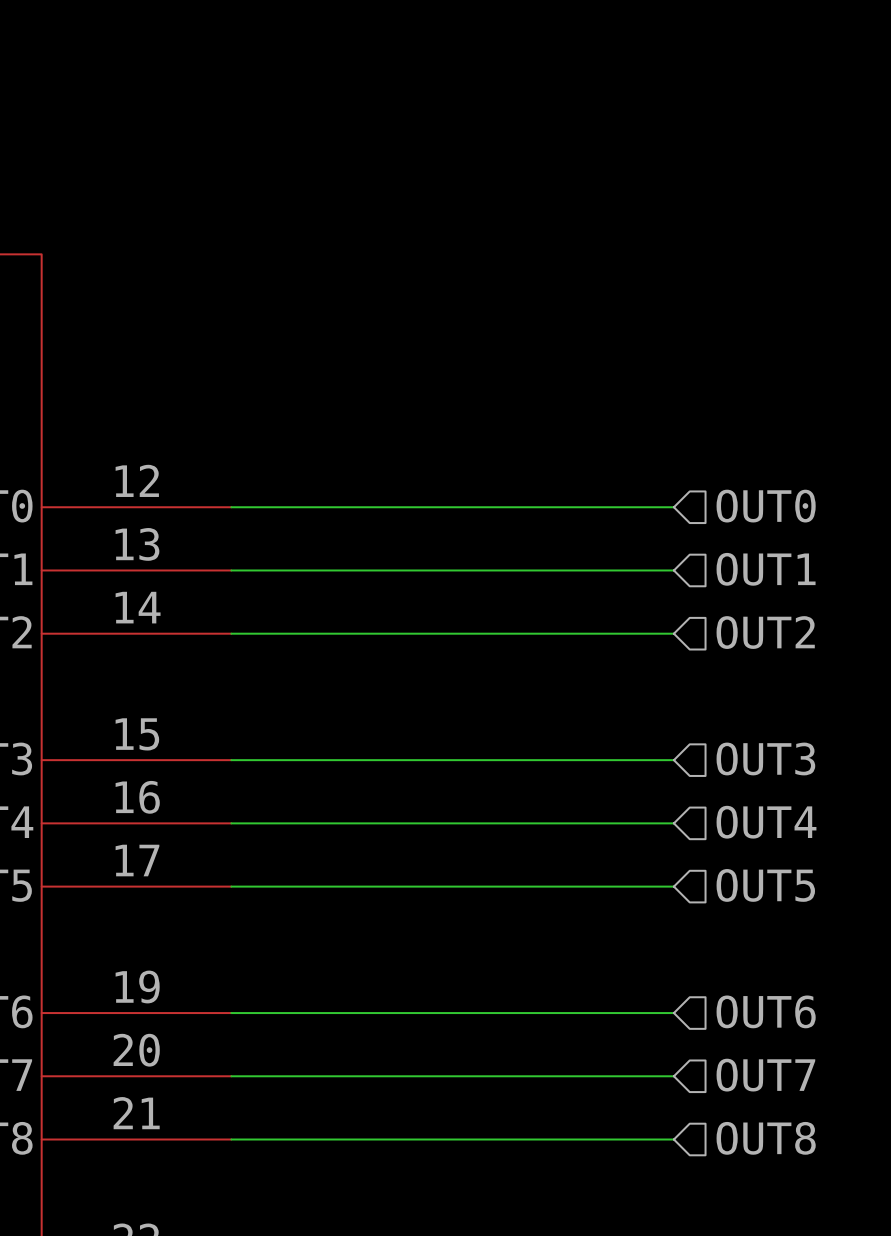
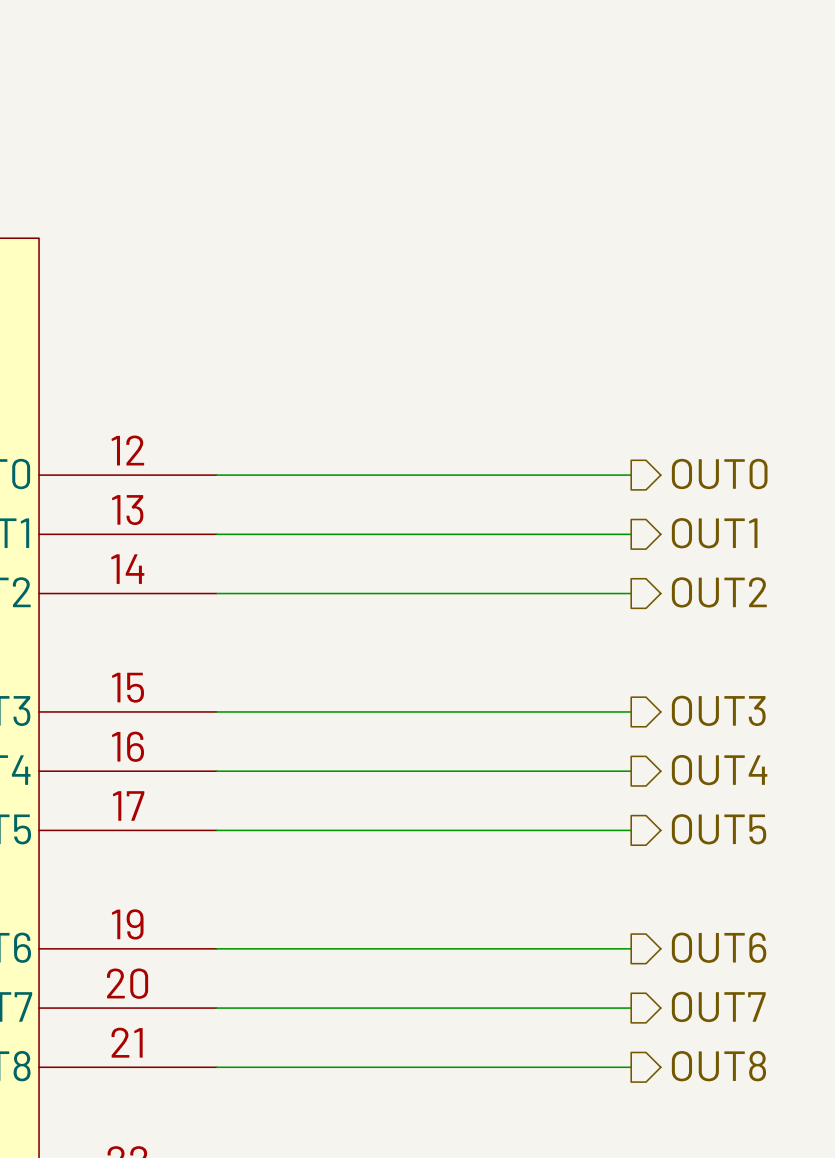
hierarchical label shape: input (766, 506) -> output (719, 474)
hierarchical label shape: input (766, 569) -> output (714, 533)
hierarchical label shape: input (765, 632) -> output (719, 592)
hierarchical label shape: input (765, 758) -> output (718, 710)
hierarchical label shape: input (766, 822) -> output (719, 770)
hierarchical label shape: input (765, 885) -> output (719, 829)
hierarchical label shape: input (766, 1011) -> output (719, 947)
hierarchical label shape: input (765, 1075) -> output (718, 1006)
hierarchical label shape: input (766, 1138) -> output (718, 1066)

